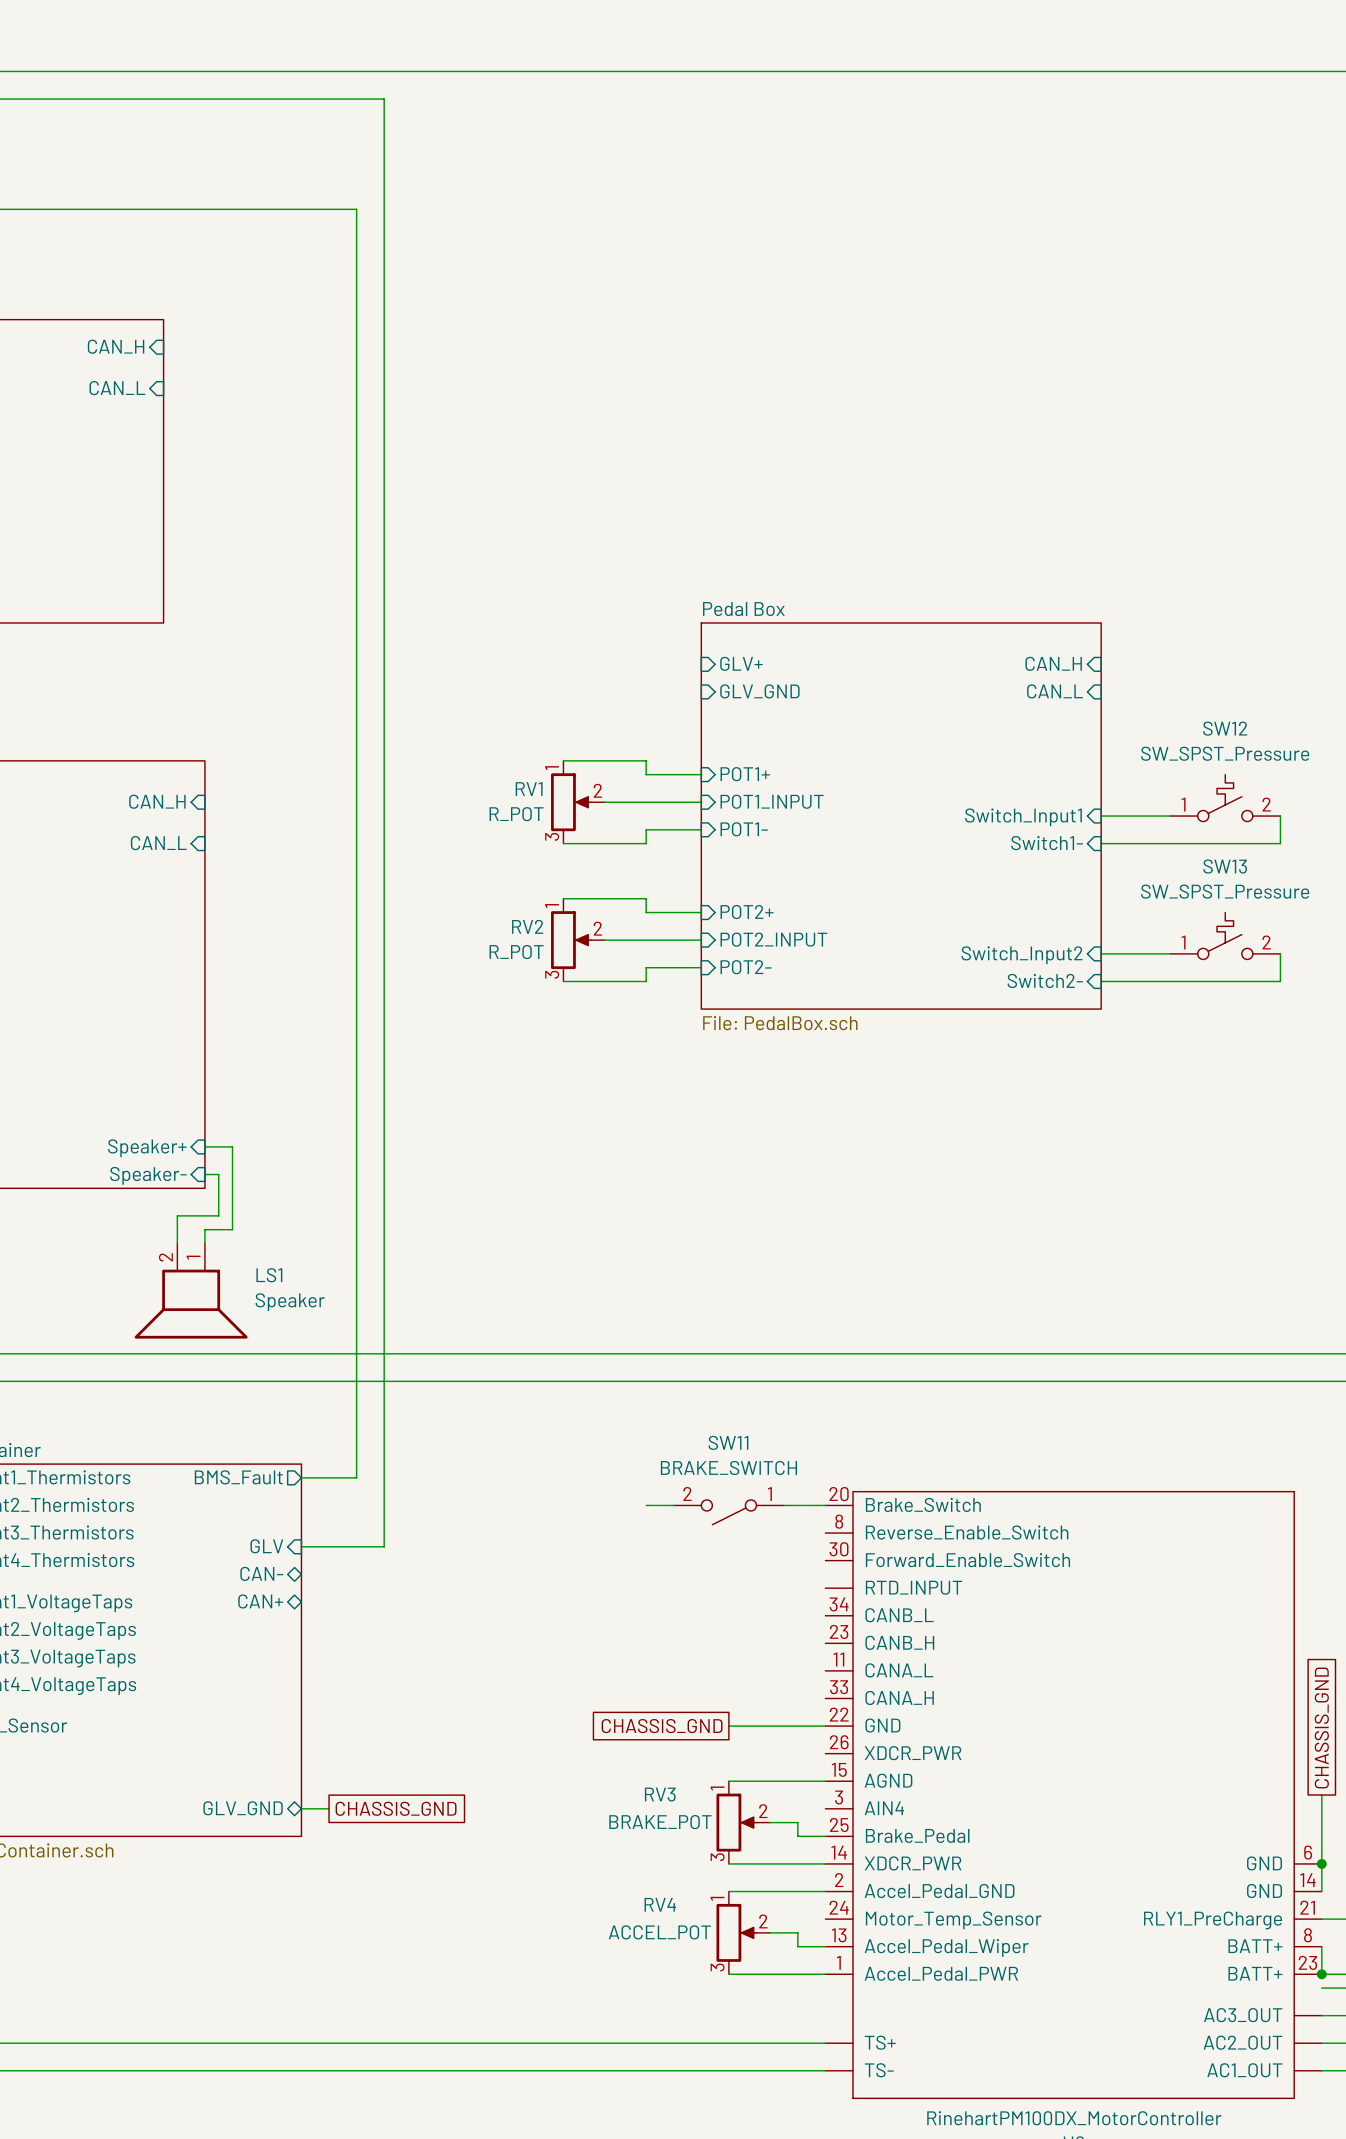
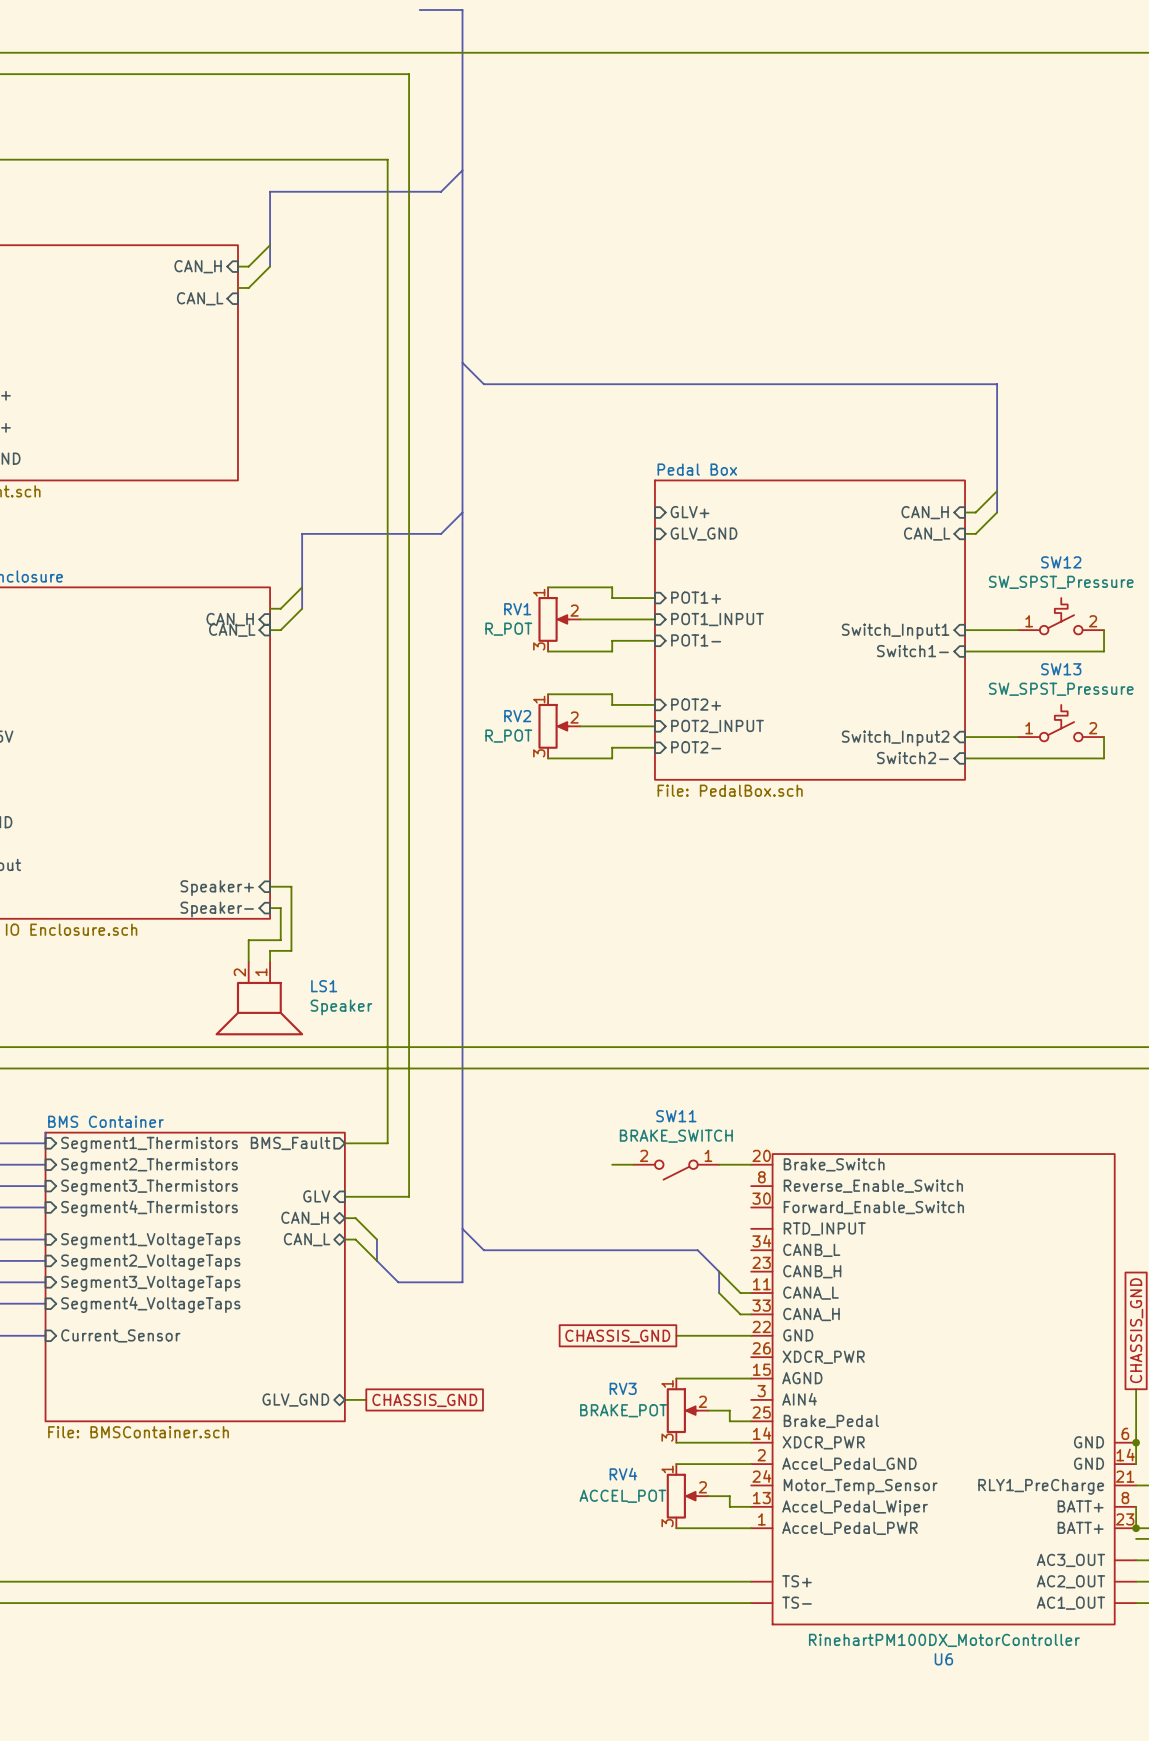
bus: none -> (419, 10) (462, 10) (462, 1282) (398, 1282) (376, 1260) (376, 1239)
bus: none -> (462, 170) (441, 191) (270, 191) (270, 266)
wire: none -> (270, 245) (248, 266) (237, 266)
wire: none -> (270, 266) (248, 287) (237, 287)
bus: none -> (462, 362) (483, 384) (997, 384) (997, 512)
wire: none -> (997, 491) (975, 512) (965, 512)
bus: none -> (462, 512) (441, 533) (302, 533) (302, 608)
wire: none -> (997, 512) (975, 533) (965, 533)
wire: none -> (302, 587) (280, 608) (270, 608)
wire: none -> (302, 608) (280, 630) (270, 630)
sheet pin position: CAN_L (158, 843) -> CAN_L (232, 630)
sheet pin: CAN- (261, 1573) -> CAN_H (305, 1218)
wire: none -> (344, 1218) (355, 1218) (376, 1239)
bus: none -> (462, 1228) (483, 1250) (697, 1250) (719, 1271) (719, 1293)
sheet pin: CAN+ (260, 1601) -> CAN_L (307, 1239)
wire: none -> (344, 1239) (355, 1239) (376, 1260)
wire: none -> (719, 1271) (740, 1293) (751, 1293)
wire: none -> (719, 1293) (740, 1314) (751, 1314)

